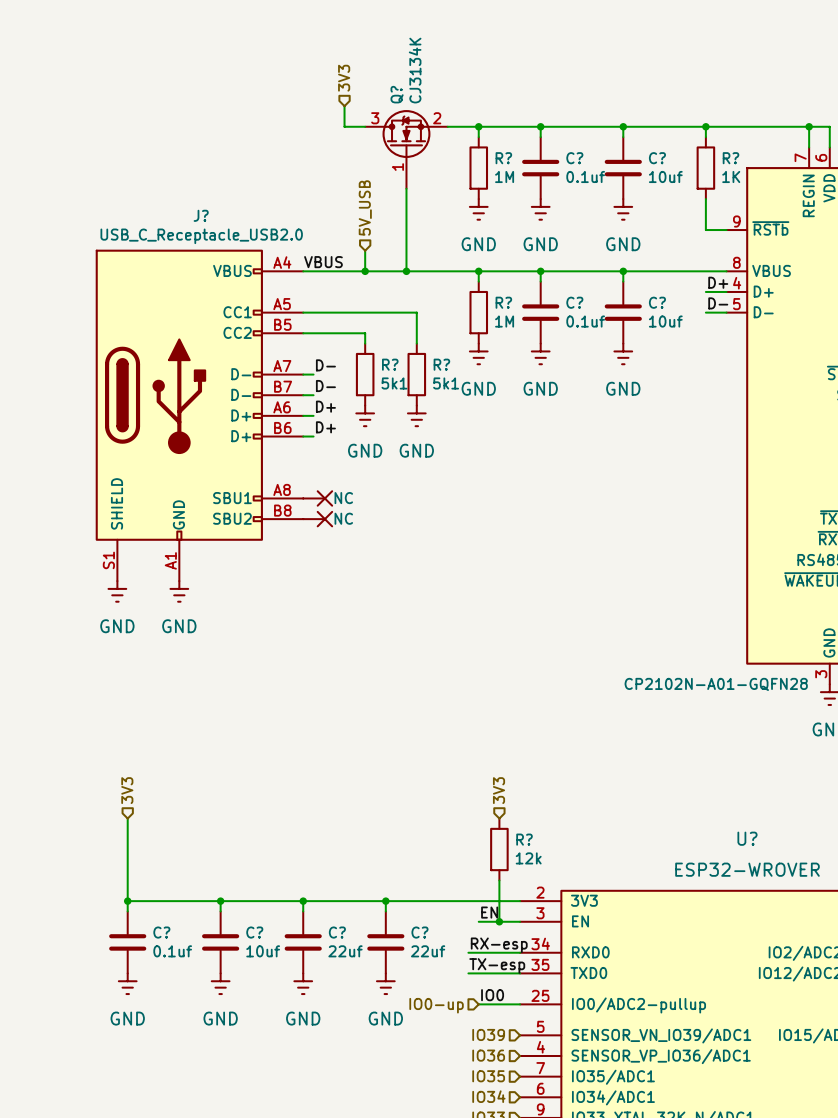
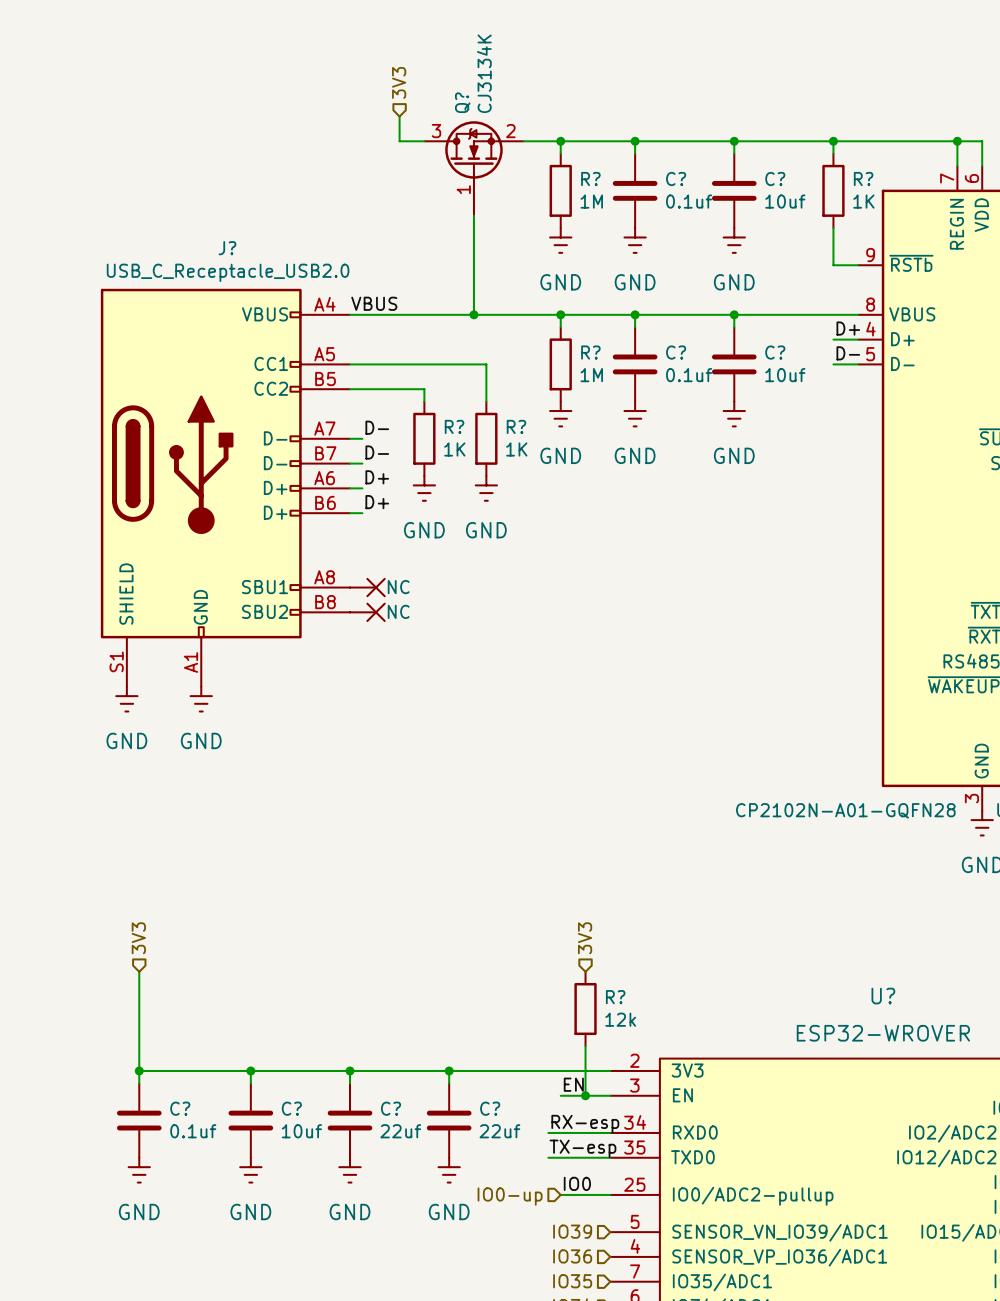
hierarchical label: 5V_USB (365, 207) -> none
wire: (365, 250) (365, 271) -> none
junction: (365, 271) -> none
R? value: 5k1 (394, 383) -> 1K (454, 449)
R? value: 5k1 (446, 383) -> 1K (516, 449)

